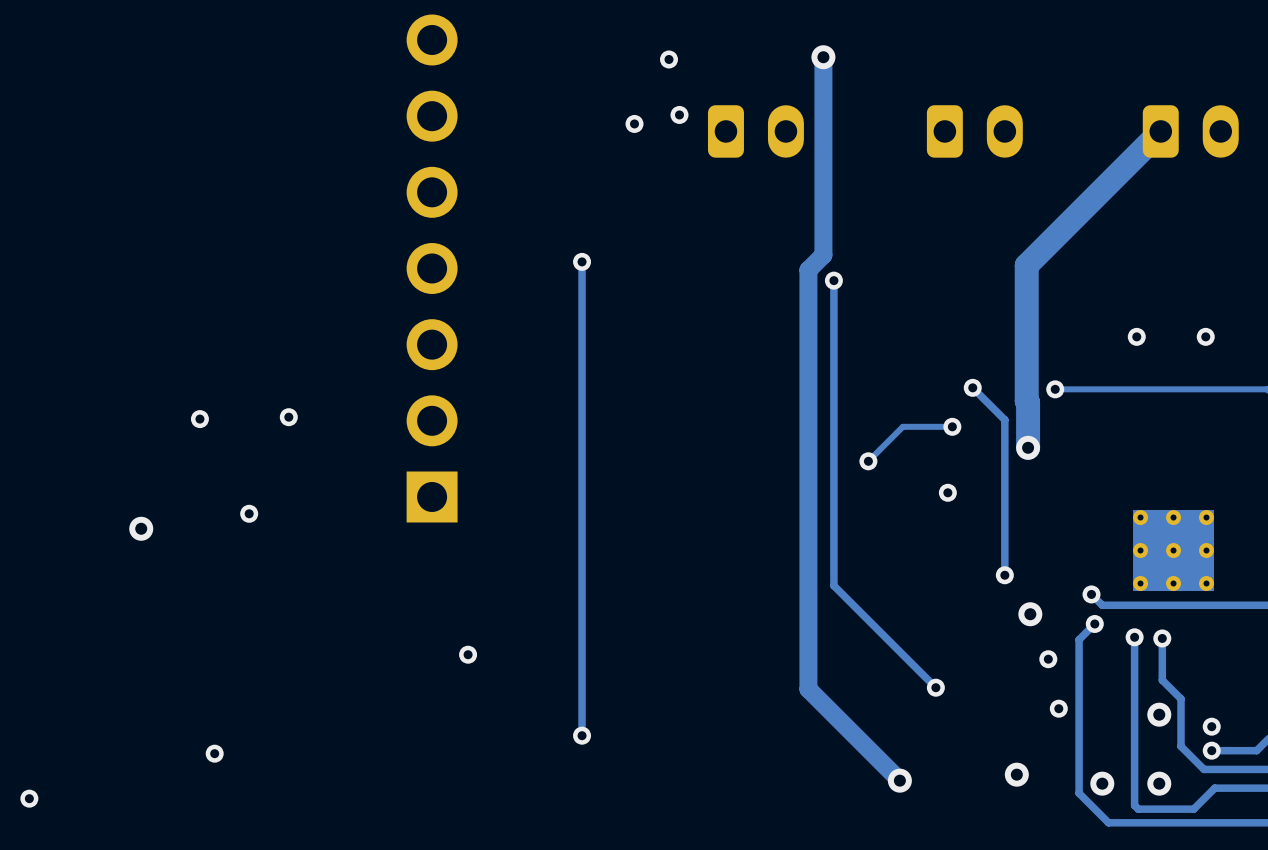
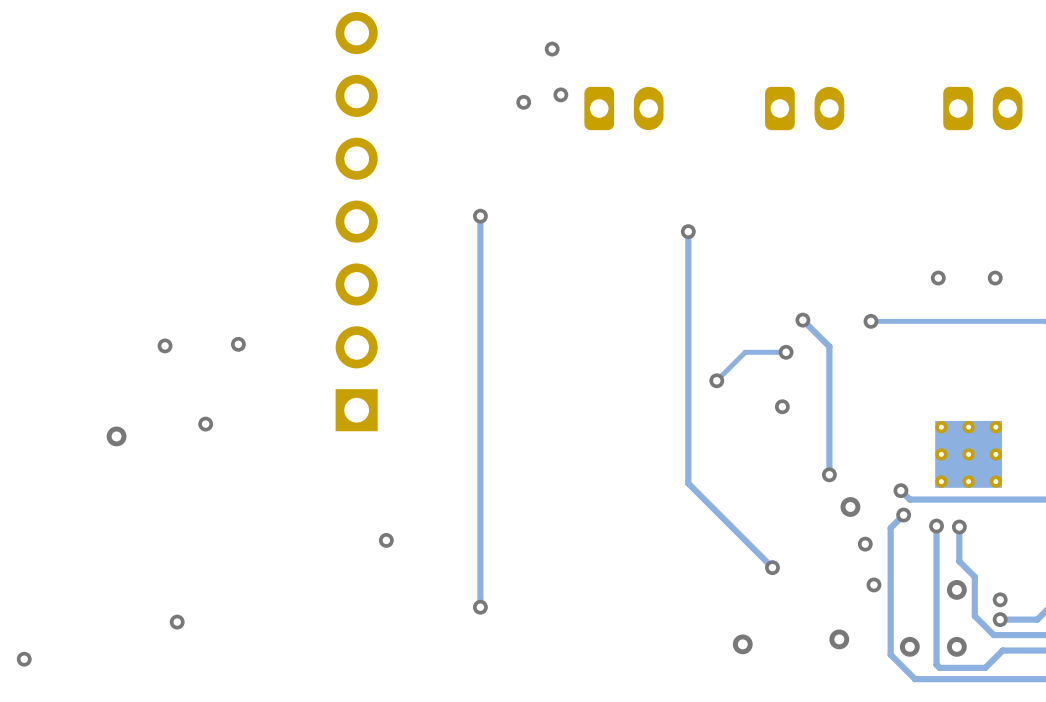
track: (823, 57) (823, 255) (808, 270) (808, 689) (899, 780) -> none
via: (823, 57) -> none
track: (1160, 131) (1026, 265) (1028, 447) -> none
via: (1028, 447) -> none

